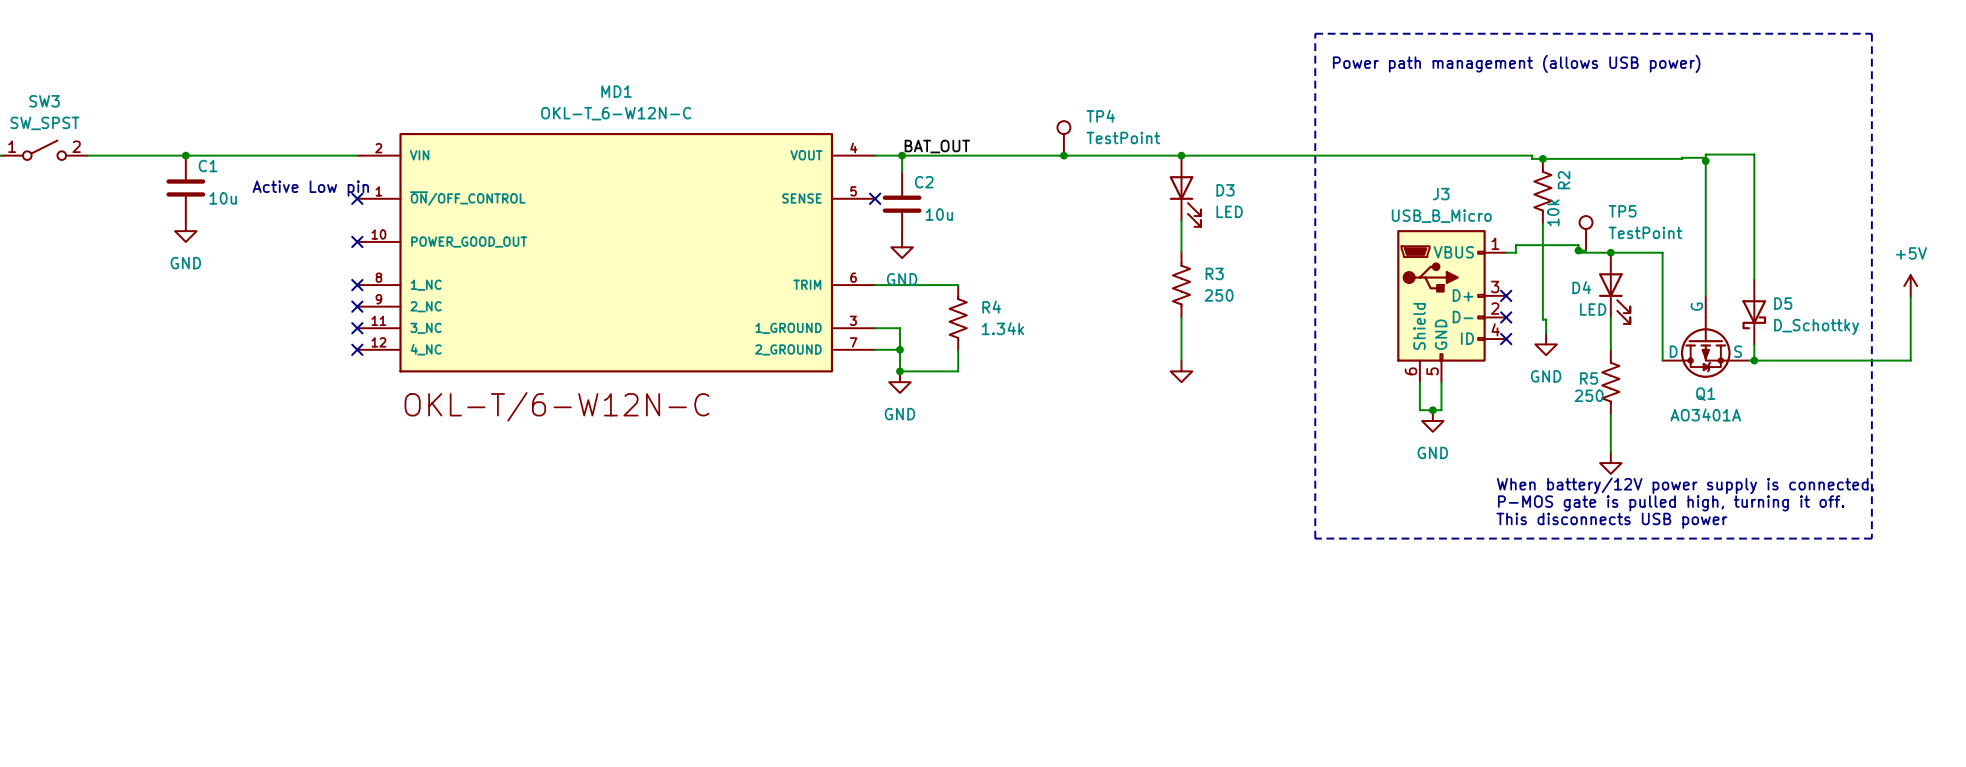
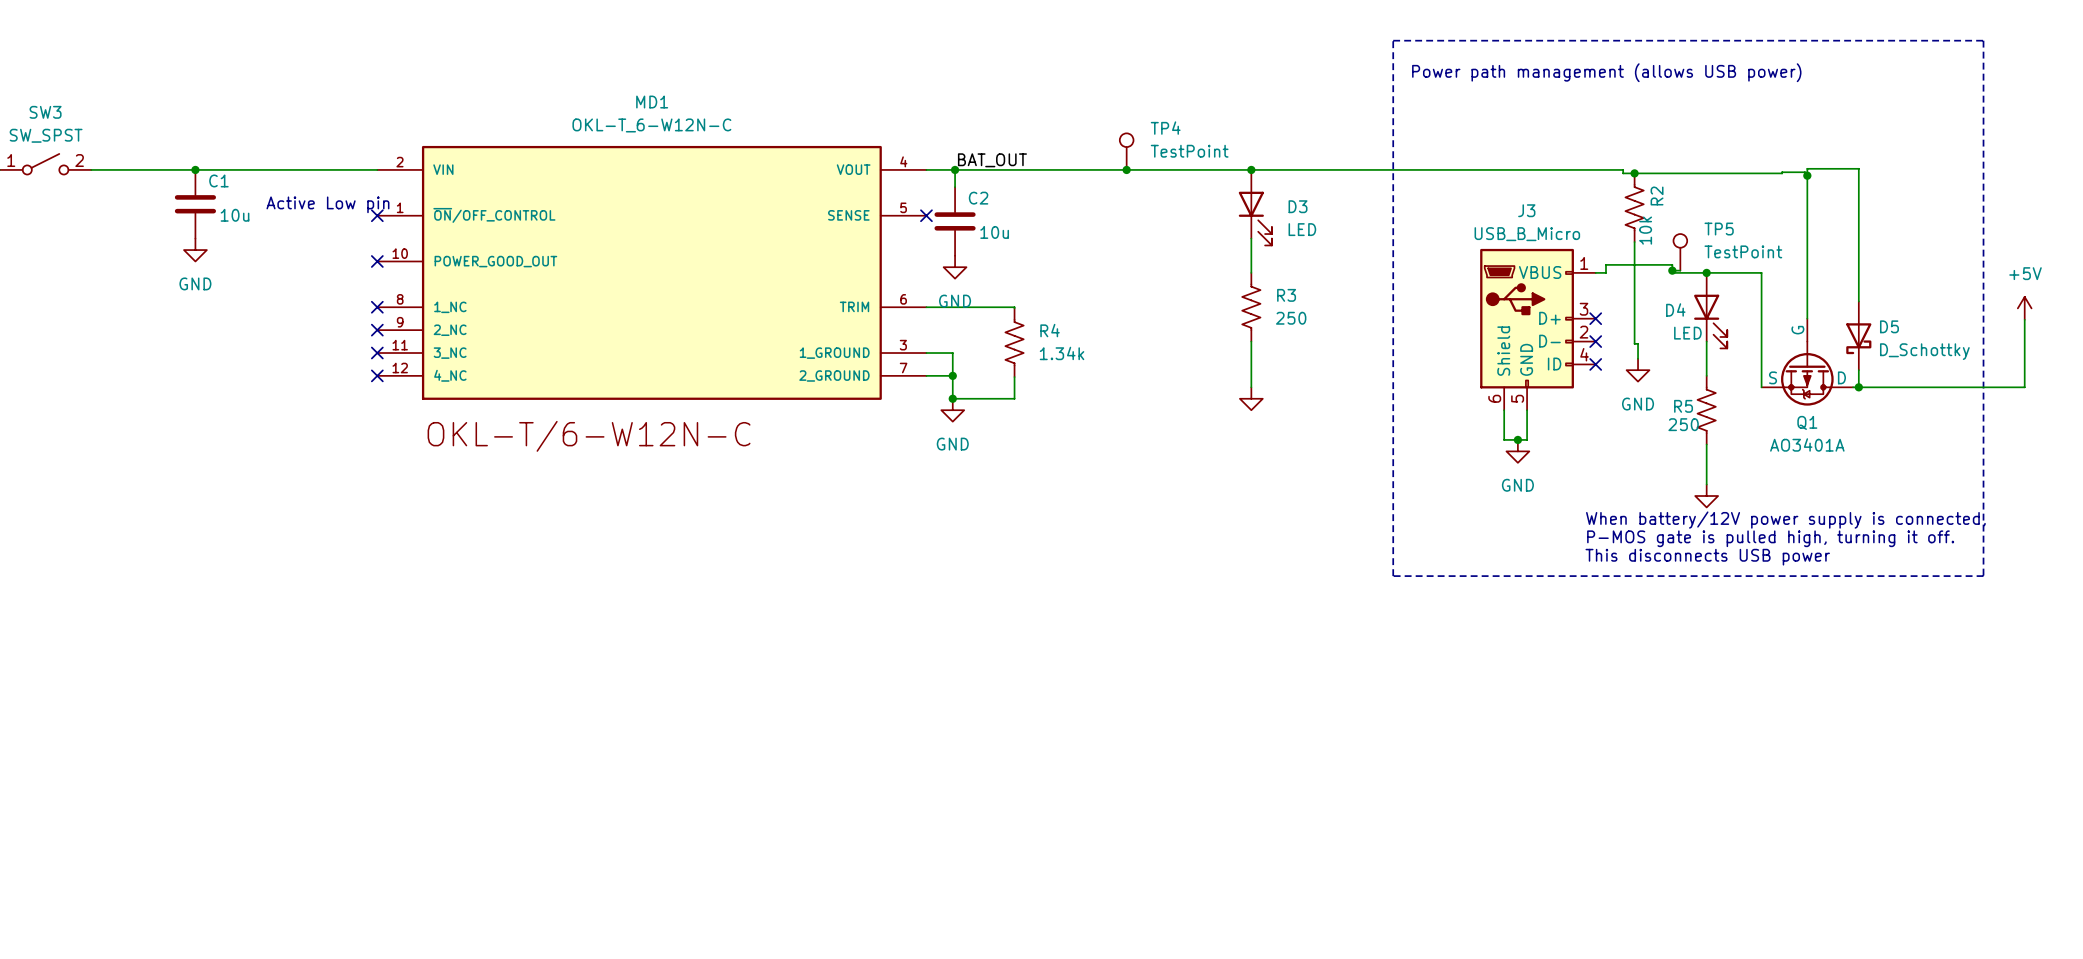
Q1 flip: as is (1705, 347) -> left-right (1807, 373)

